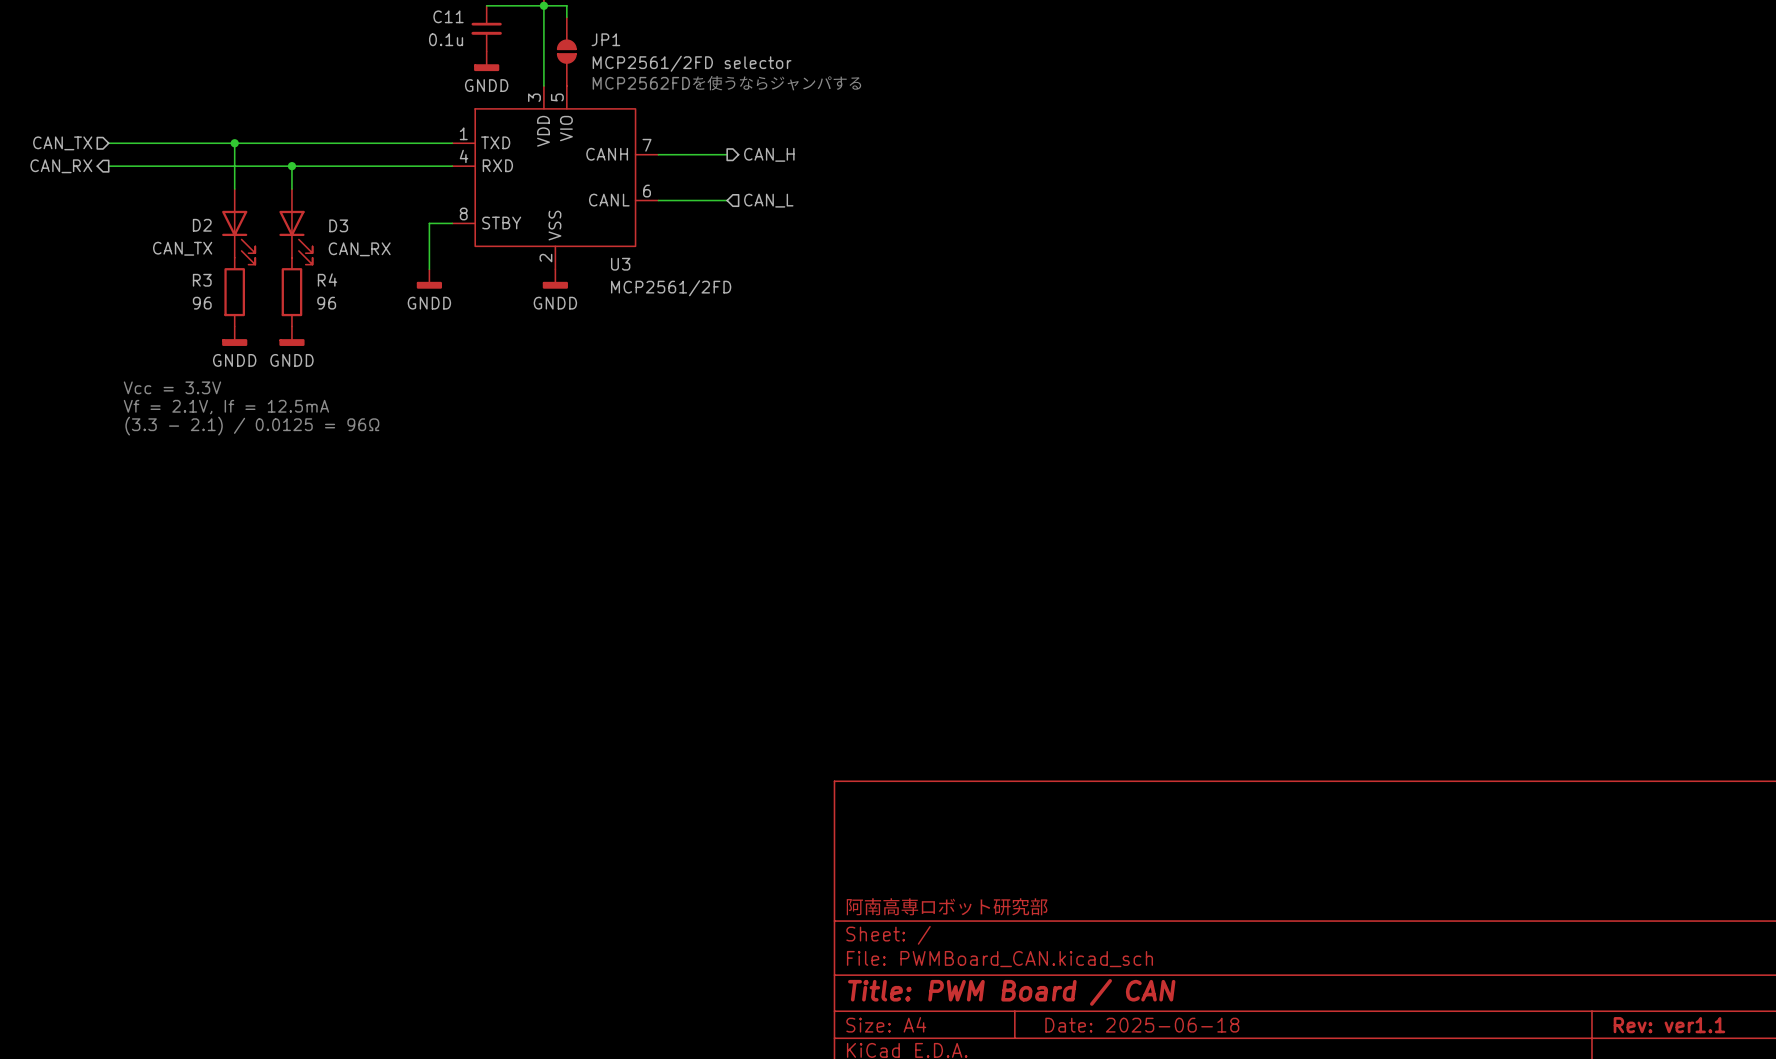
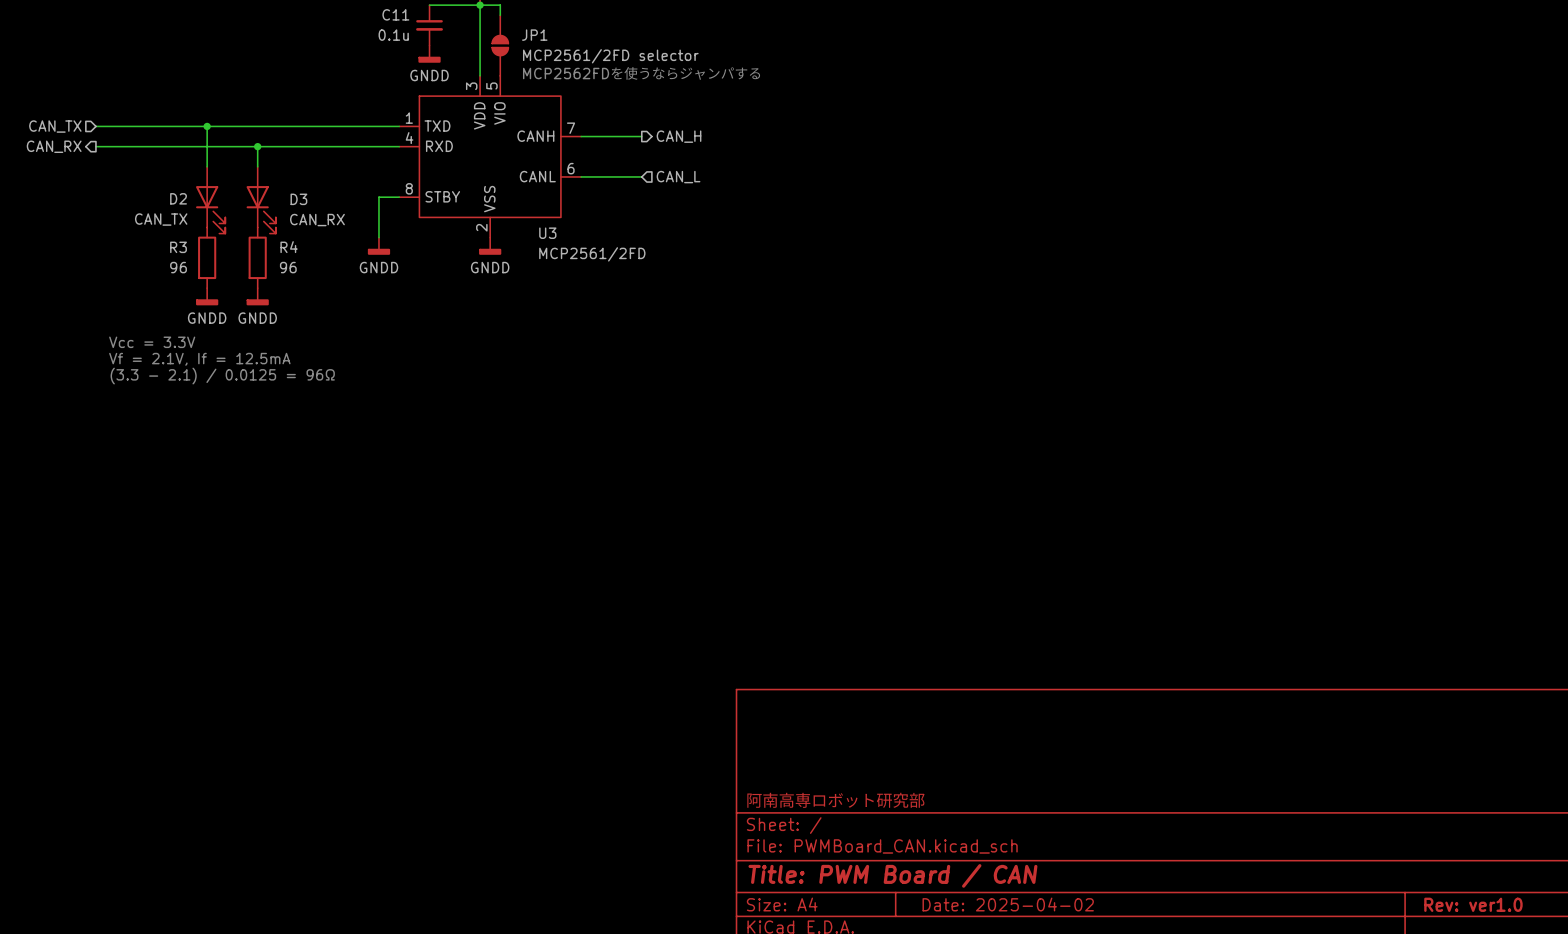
title block: Date: 2025-06-18 (1142, 1025) -> Date: 2025-04-02 (1008, 904)
title block: Rev: ver1.1 (1669, 1025) -> Rev: ver1.0 (1473, 904)

